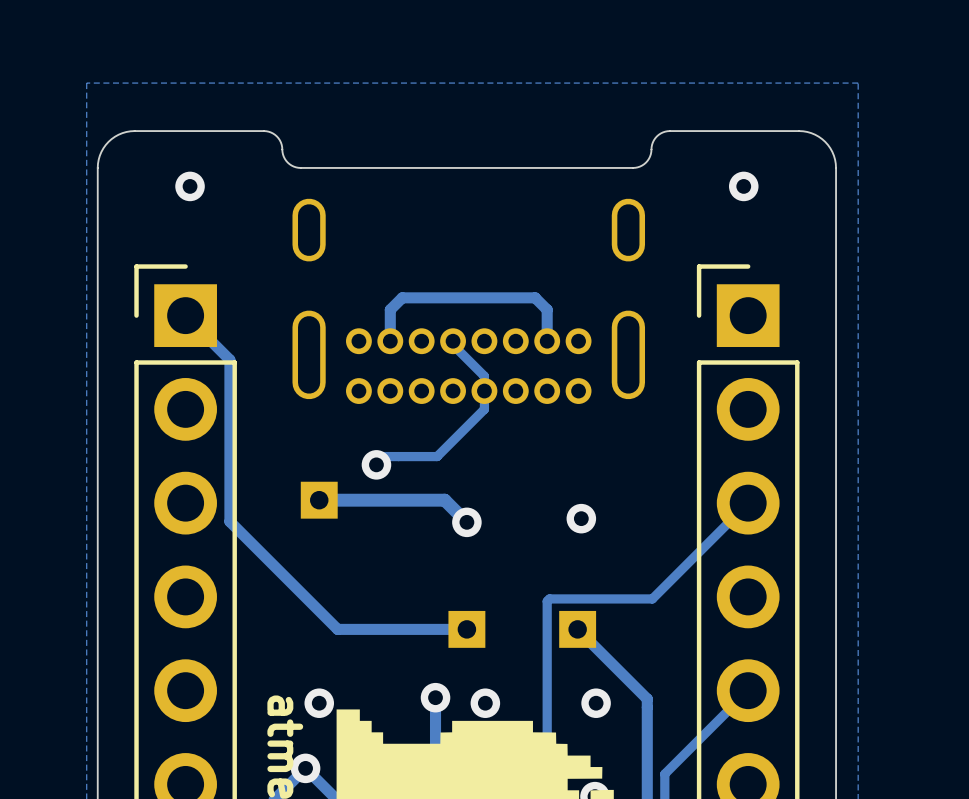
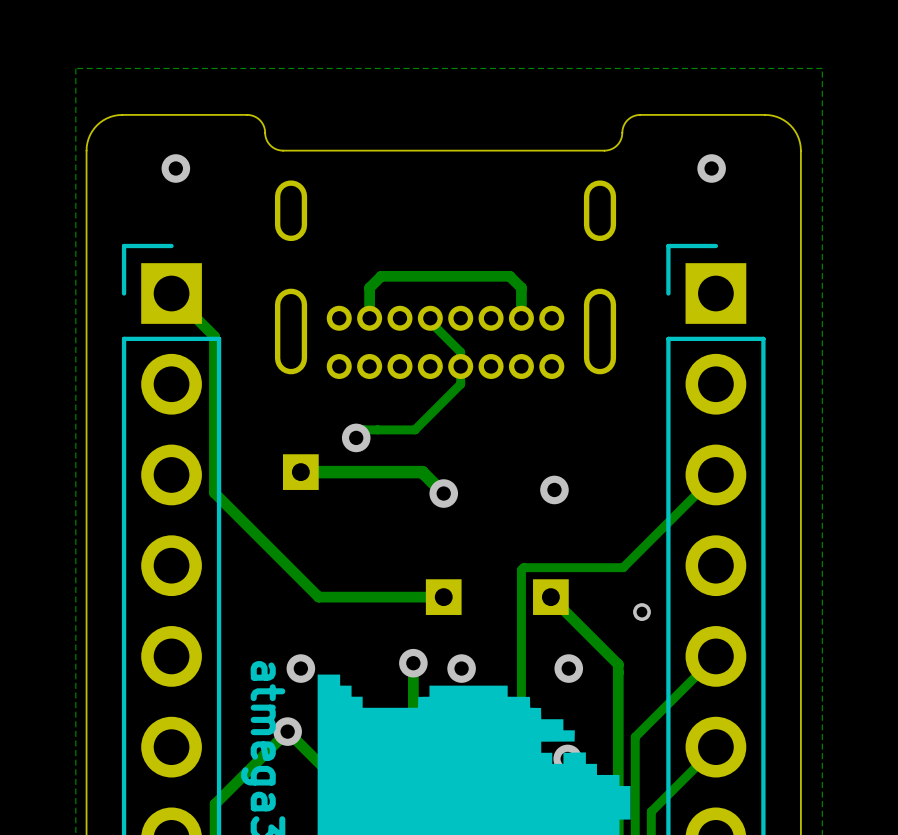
via: none -> (641, 612)

